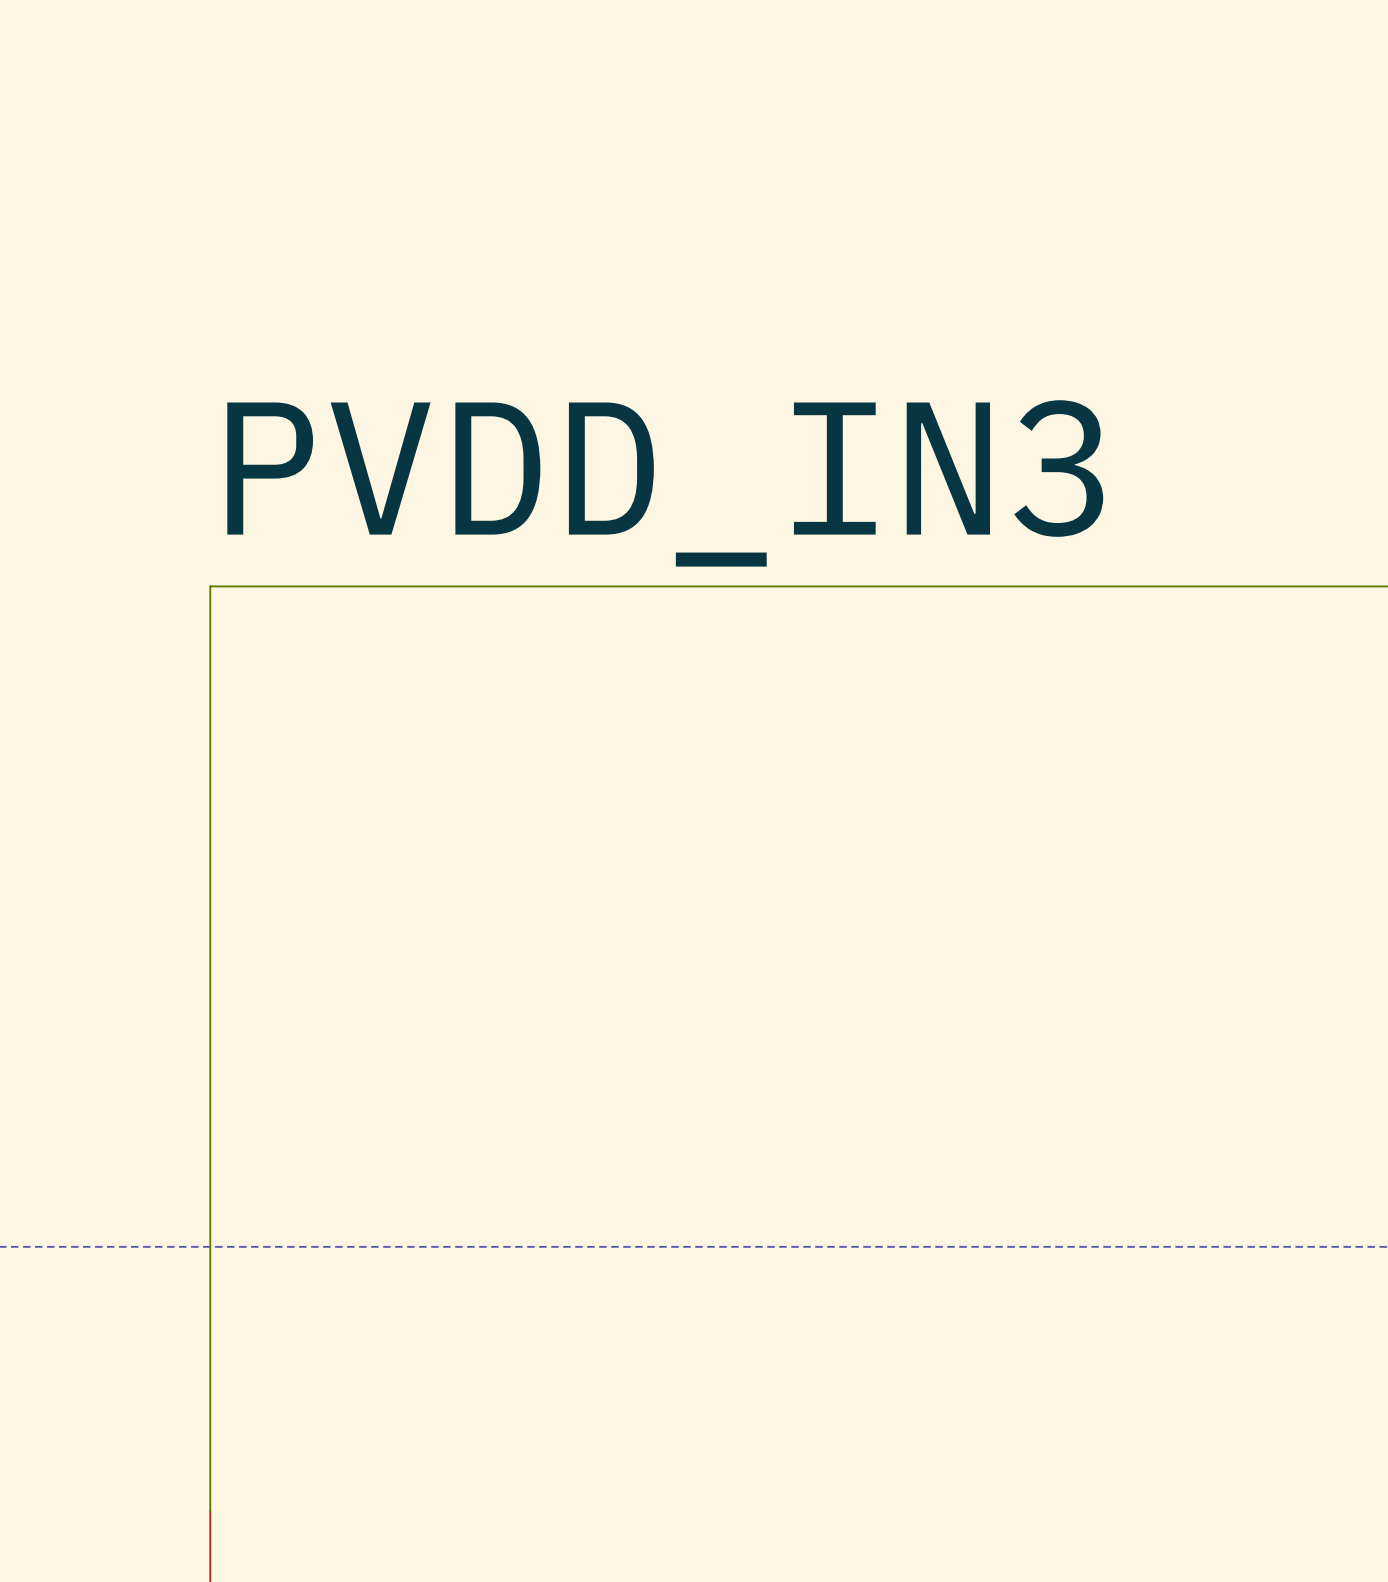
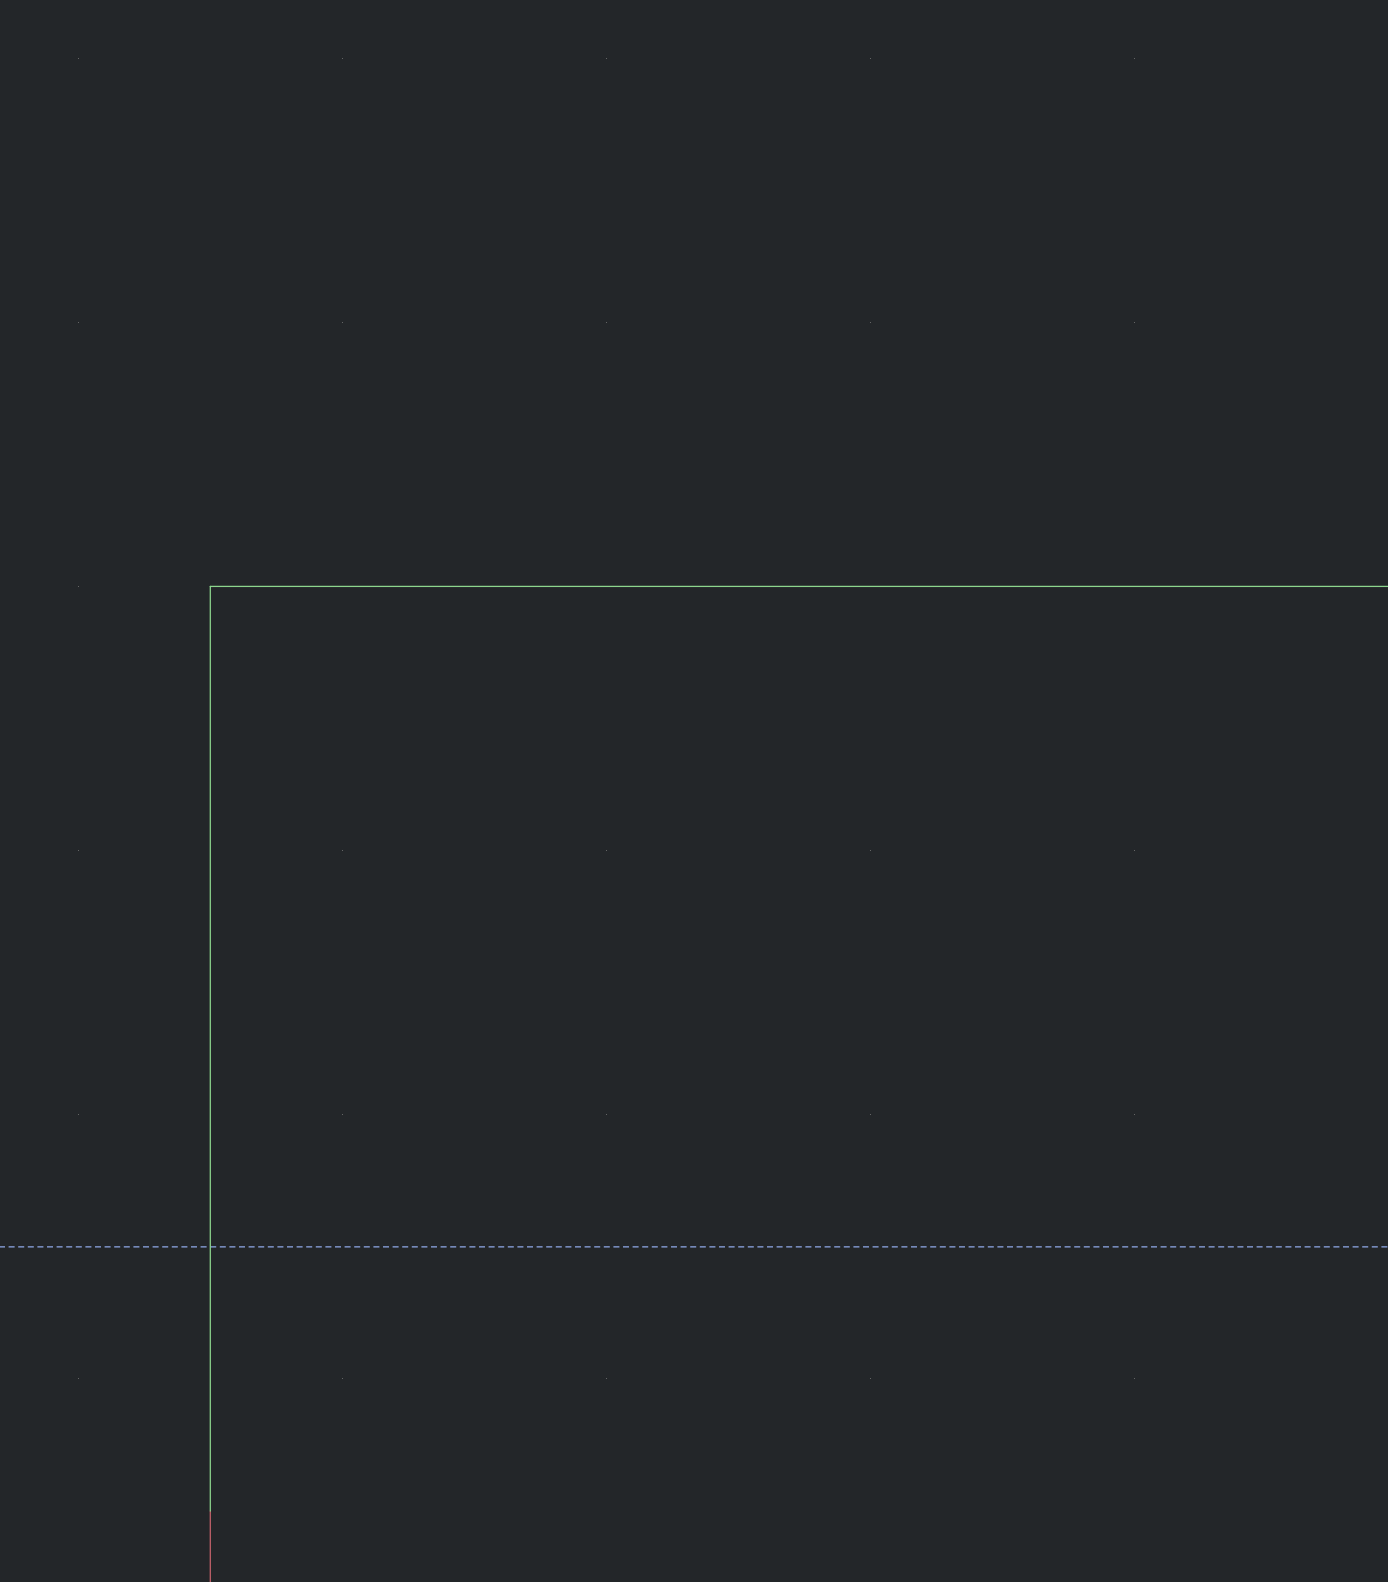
label: PVDD_IN3 (665, 483) -> none

